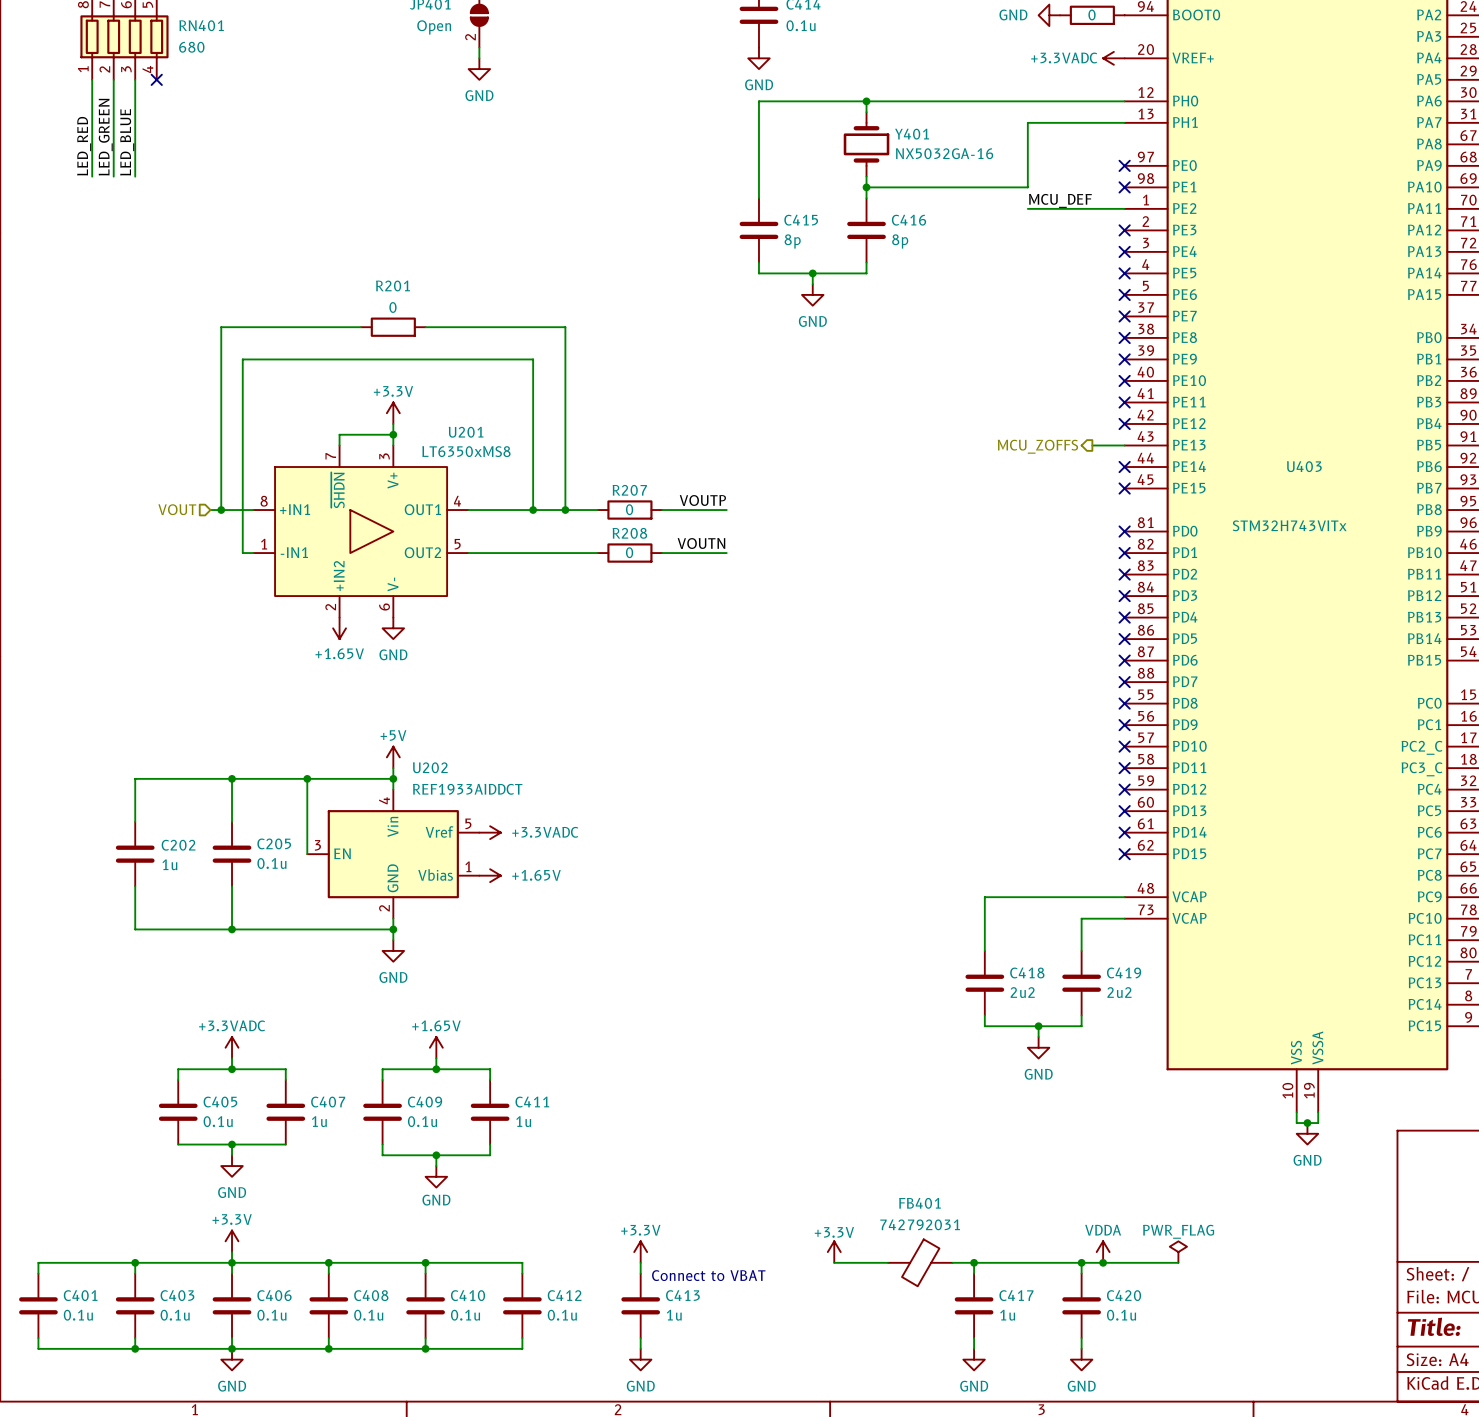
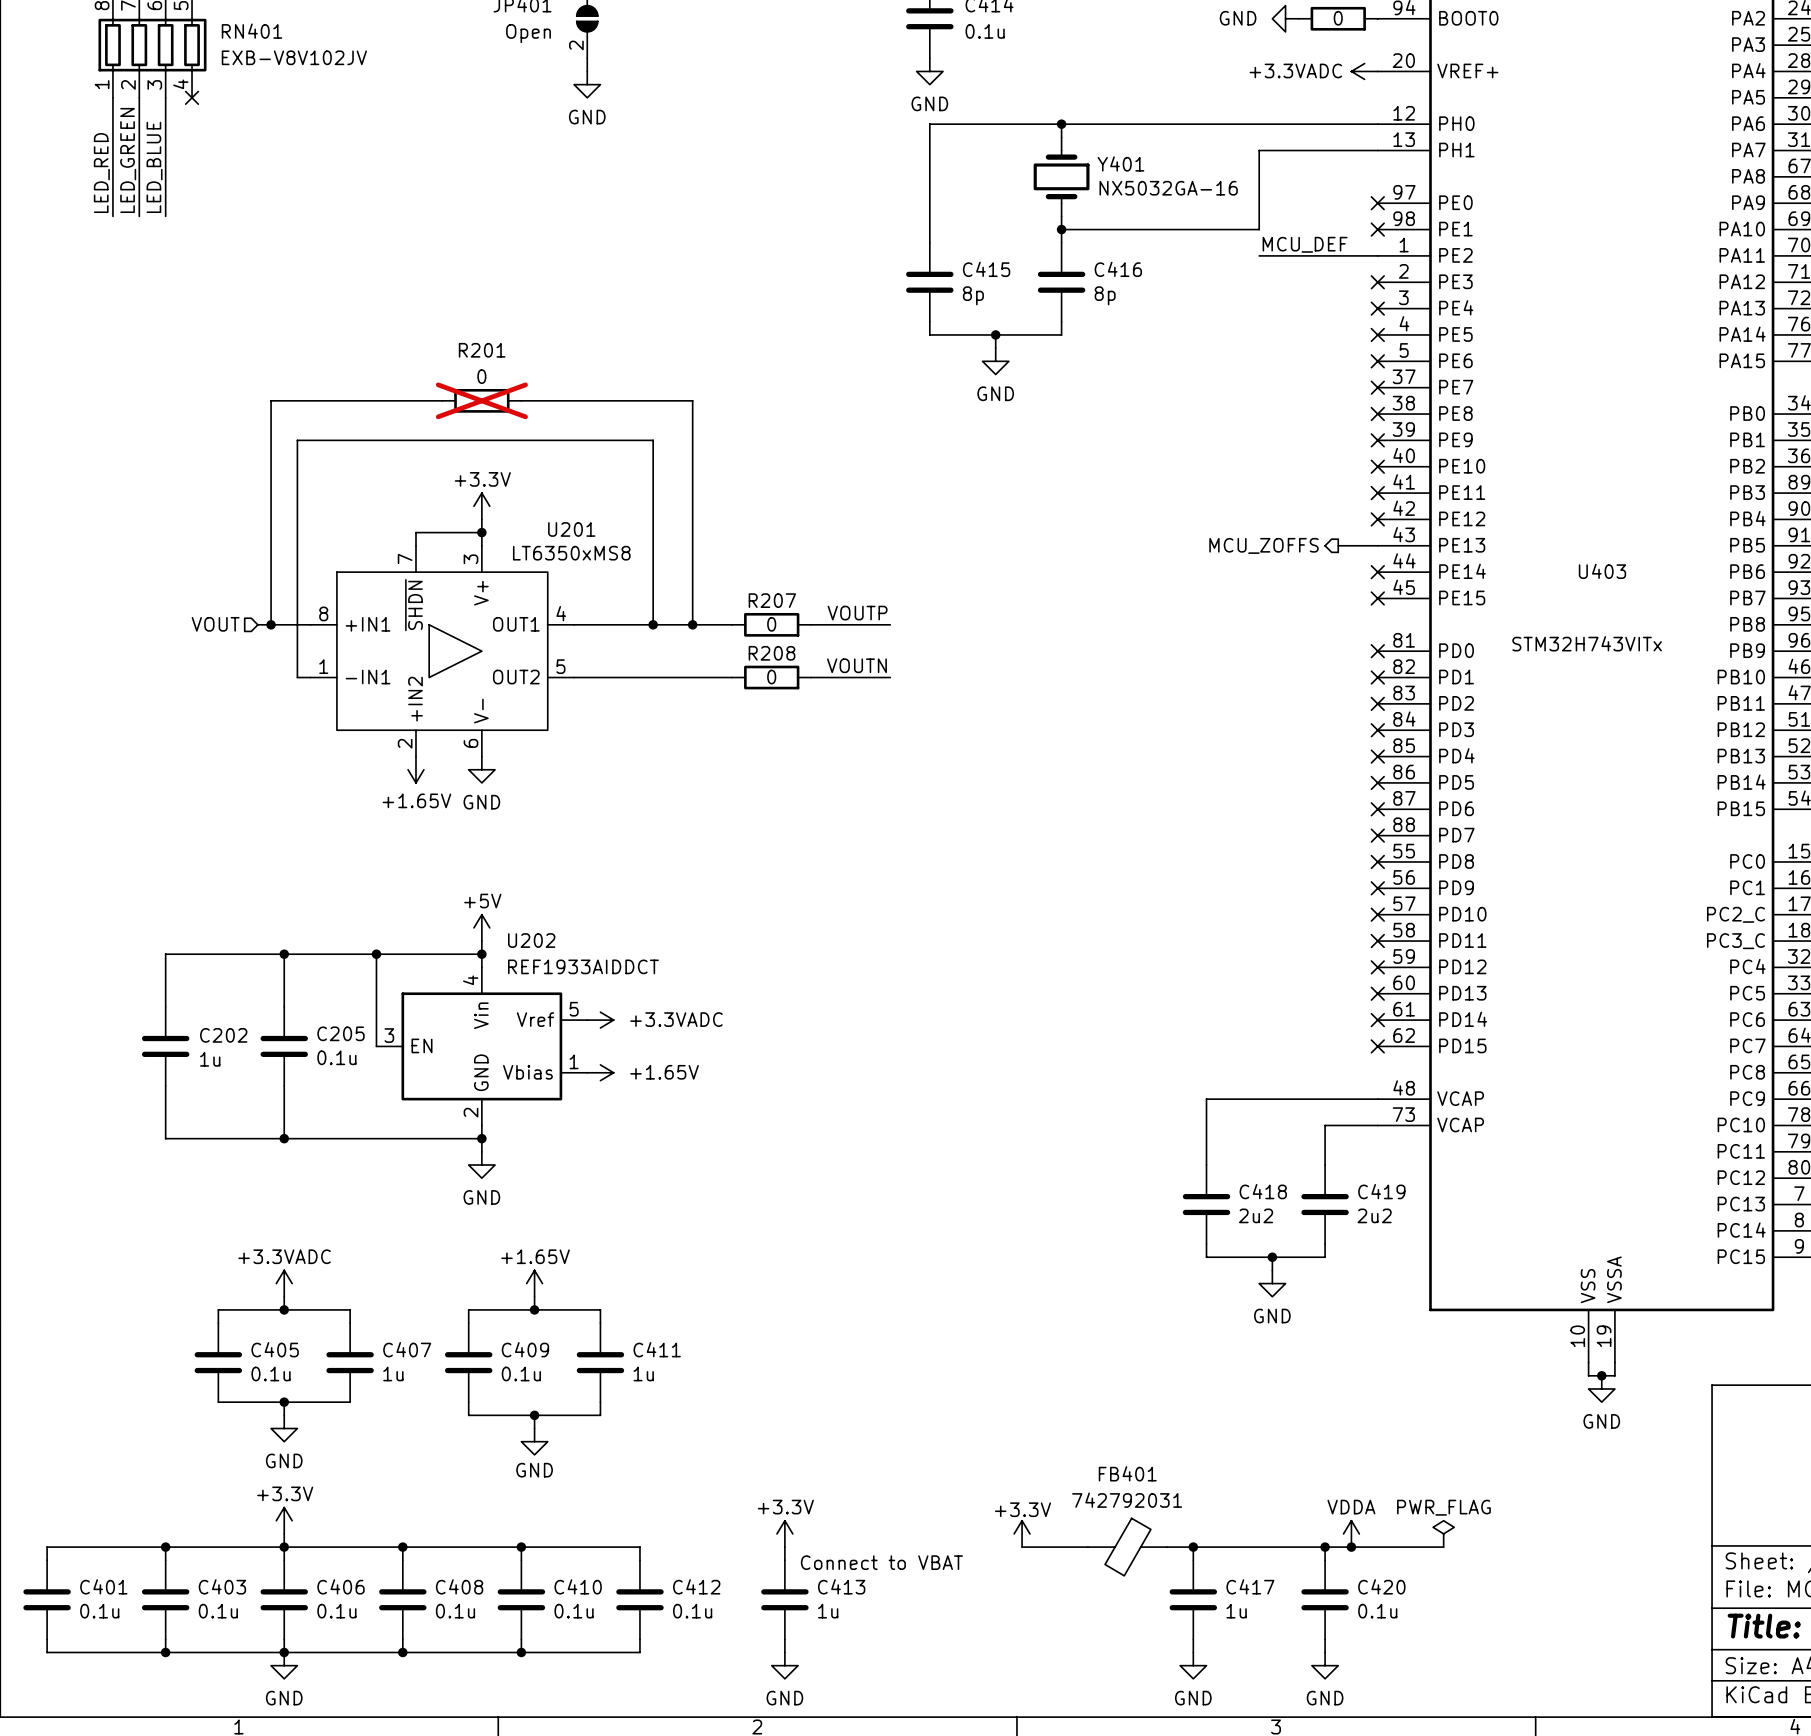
RN401 value: 680 (191, 47) -> EXB-V8V102JV (294, 57)
R201 do-not-place cross: none -> (481, 400)

